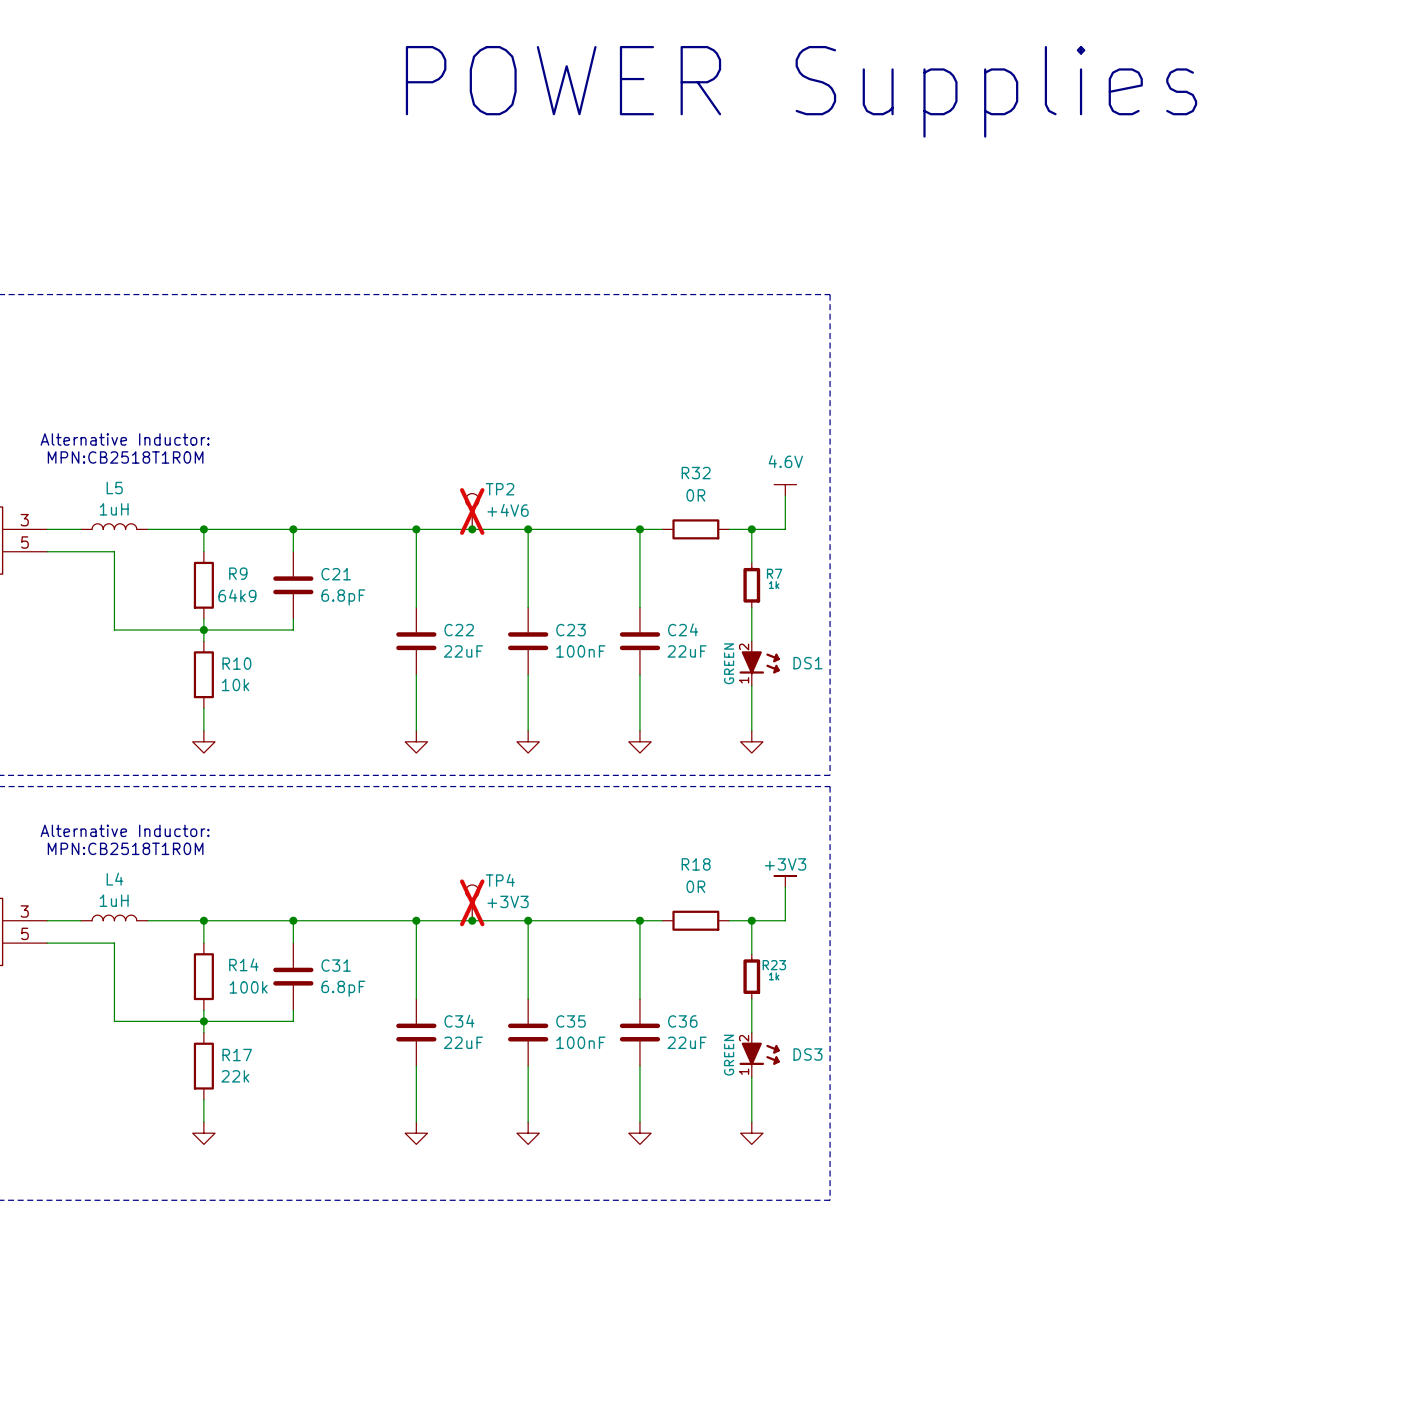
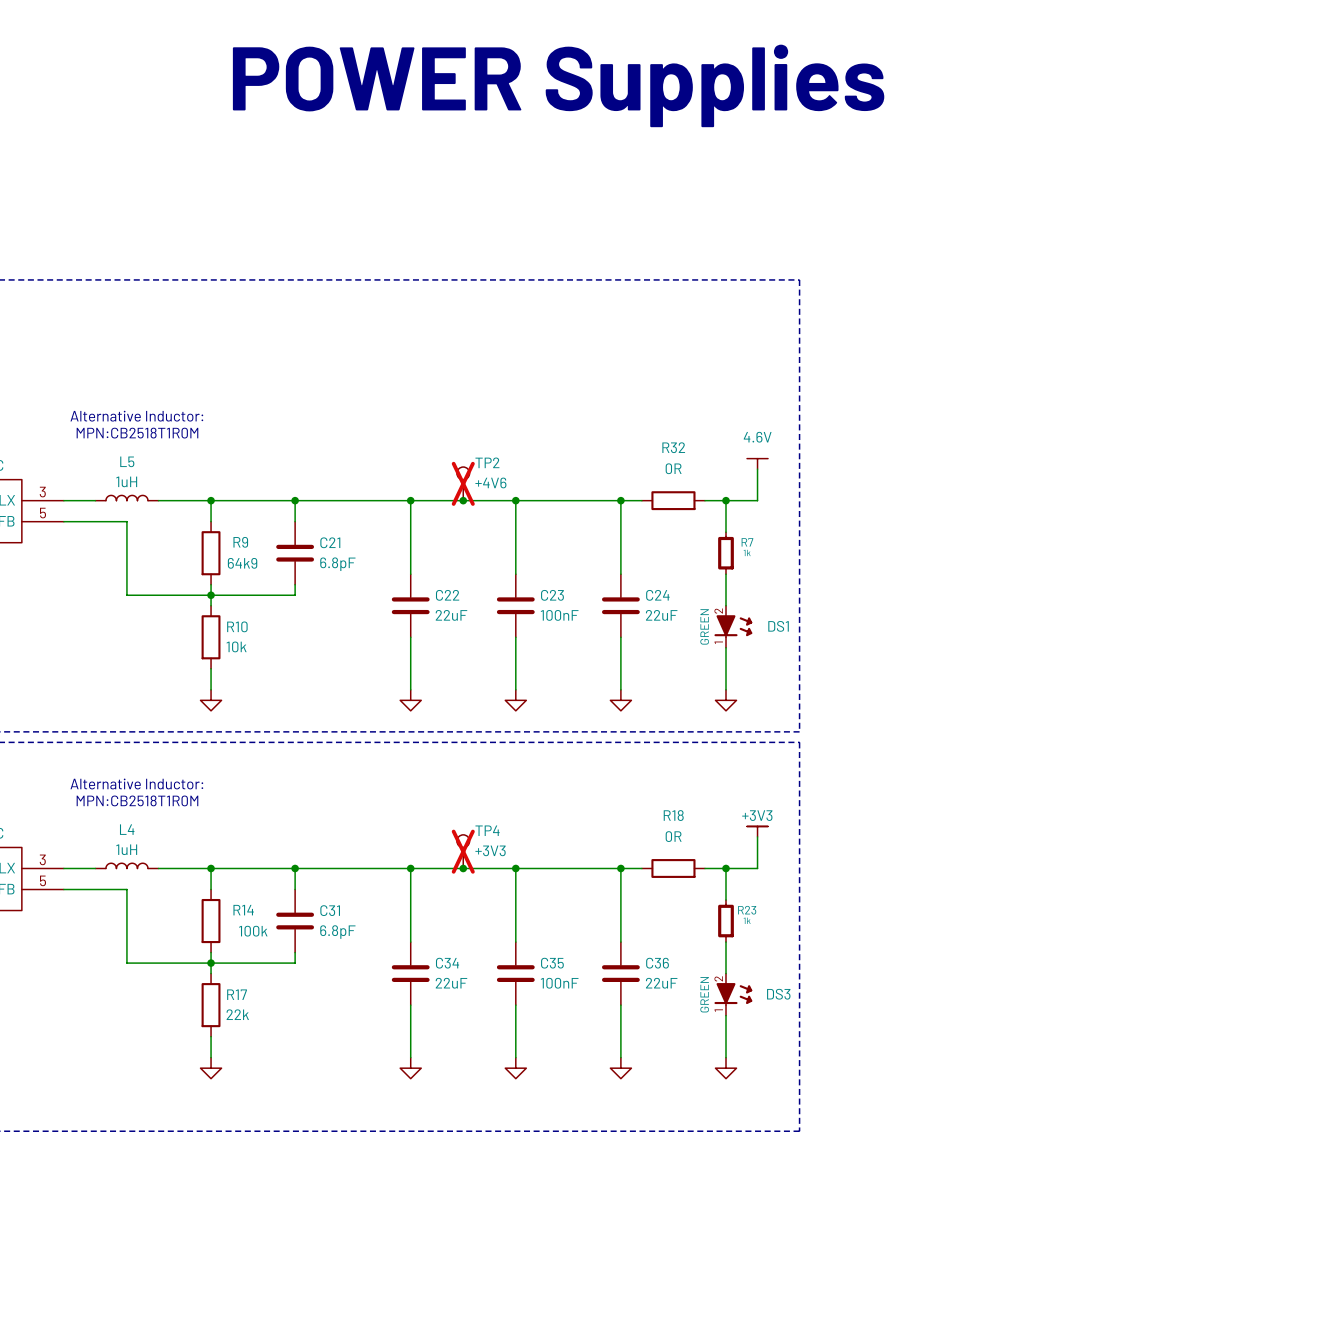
text position: POWER Supplies (801, 91) -> POWER Supplies (558, 85)

